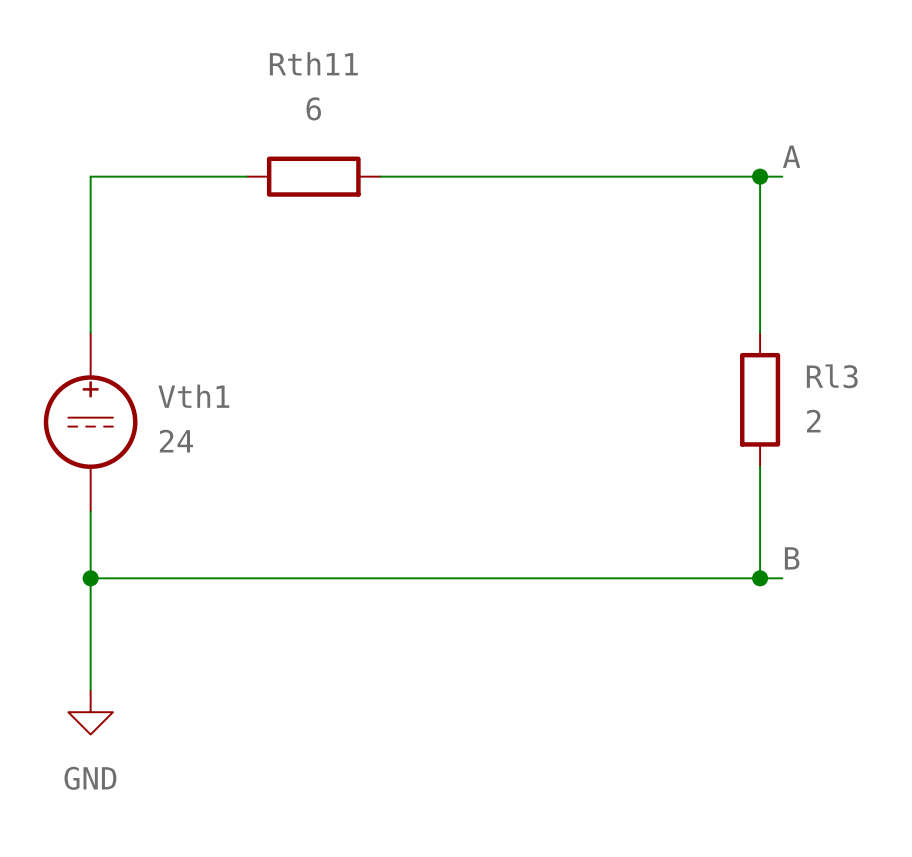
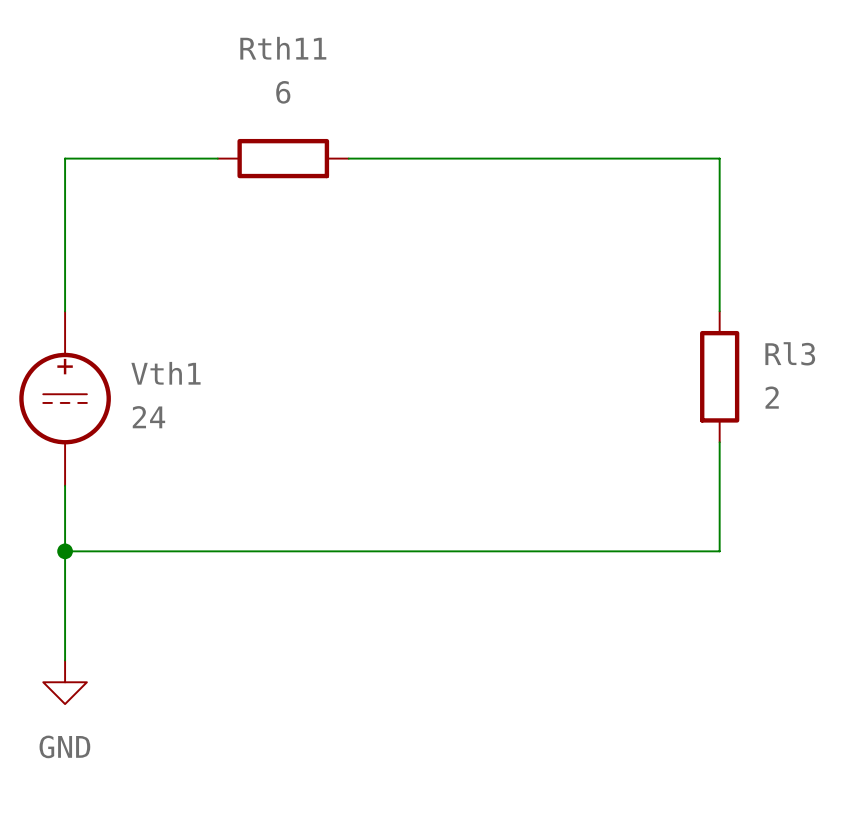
label: A (791, 156) -> none
wire: (760, 176) (782, 176) -> none
junction: (760, 176) -> none
label: B (792, 558) -> none
wire: (760, 578) (782, 578) -> none
junction: (760, 578) -> none

